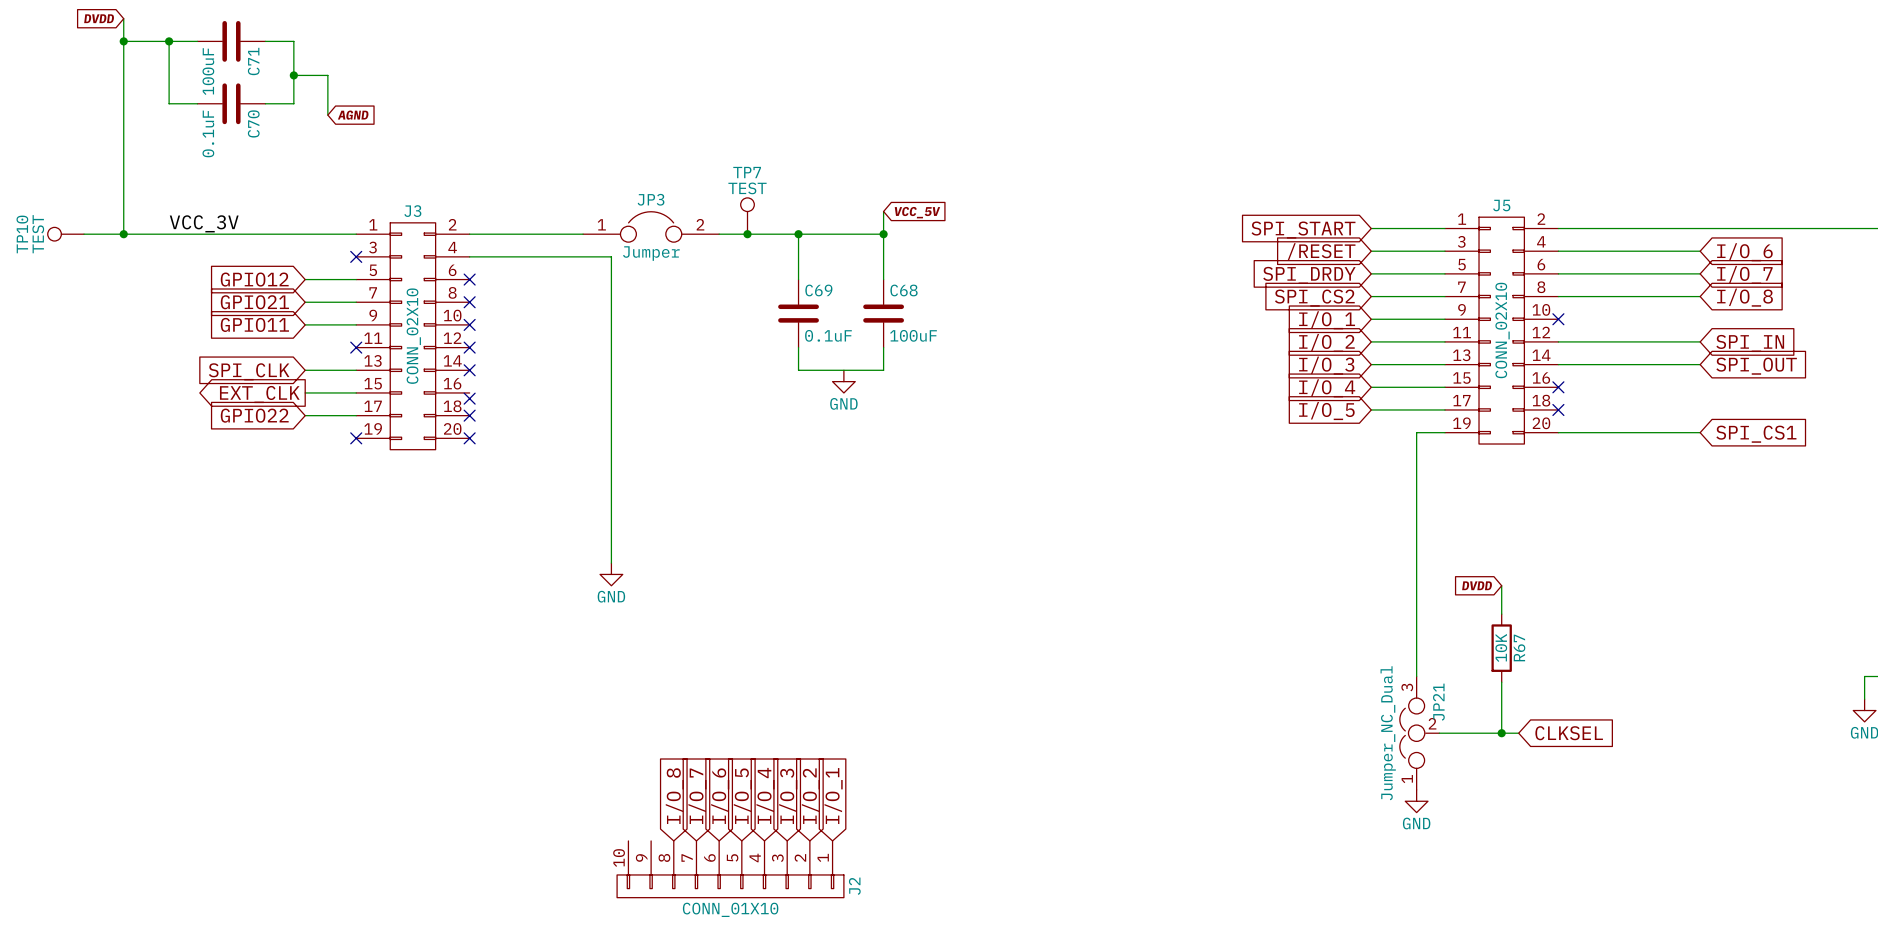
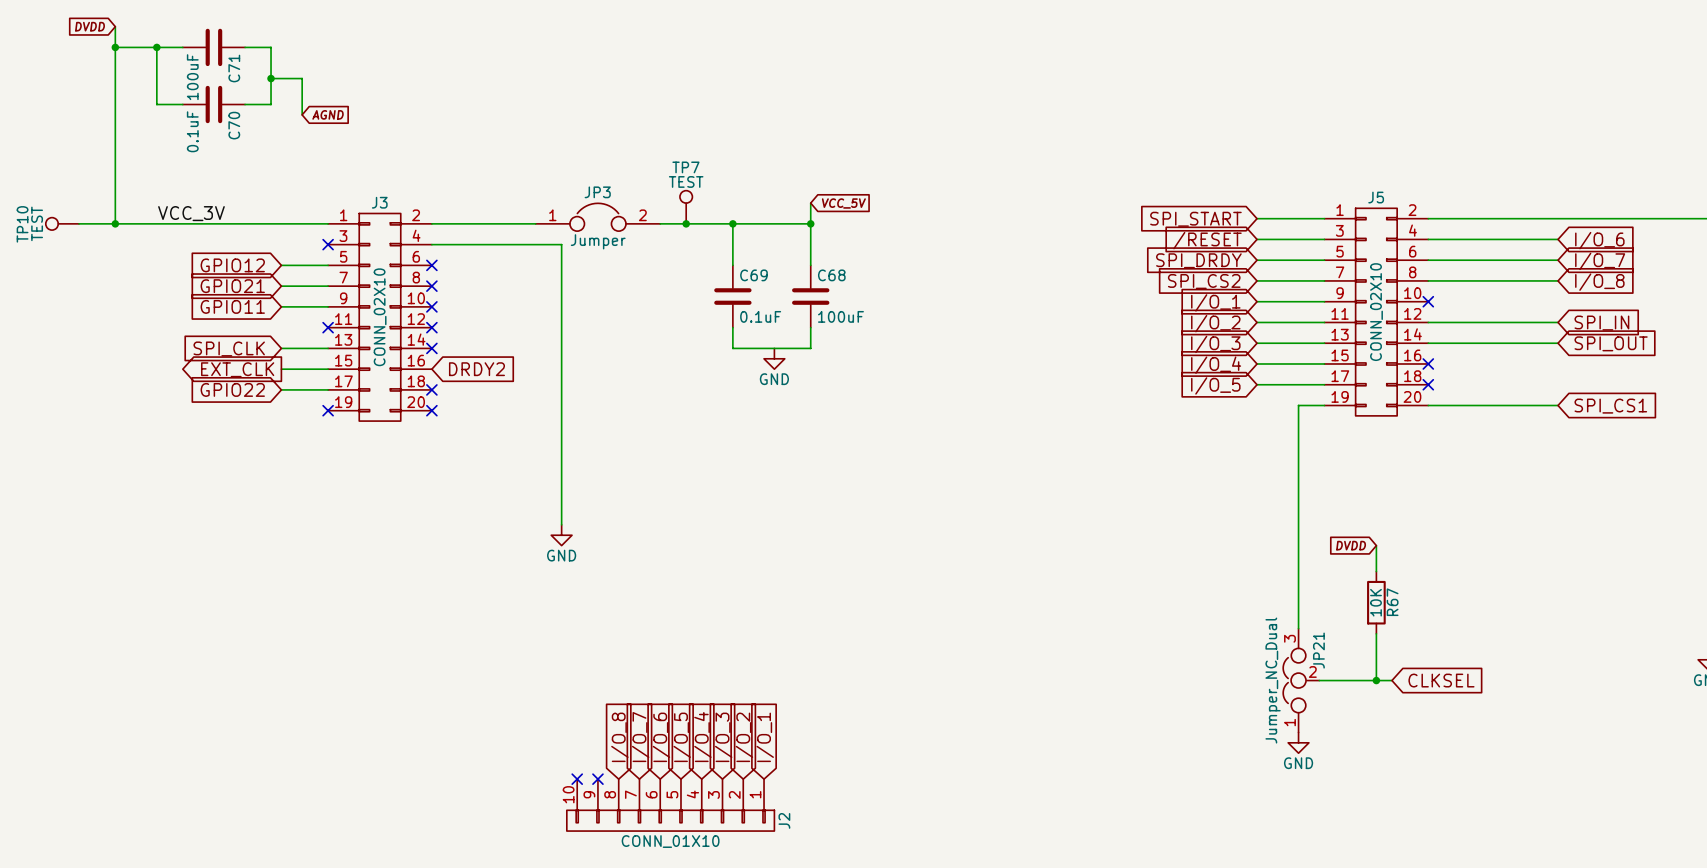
global label: none -> DRDY2 (476, 369)
no-connect mark: (469, 398) -> none
no-connect mark: none -> (577, 779)
no-connect mark: none -> (597, 779)

